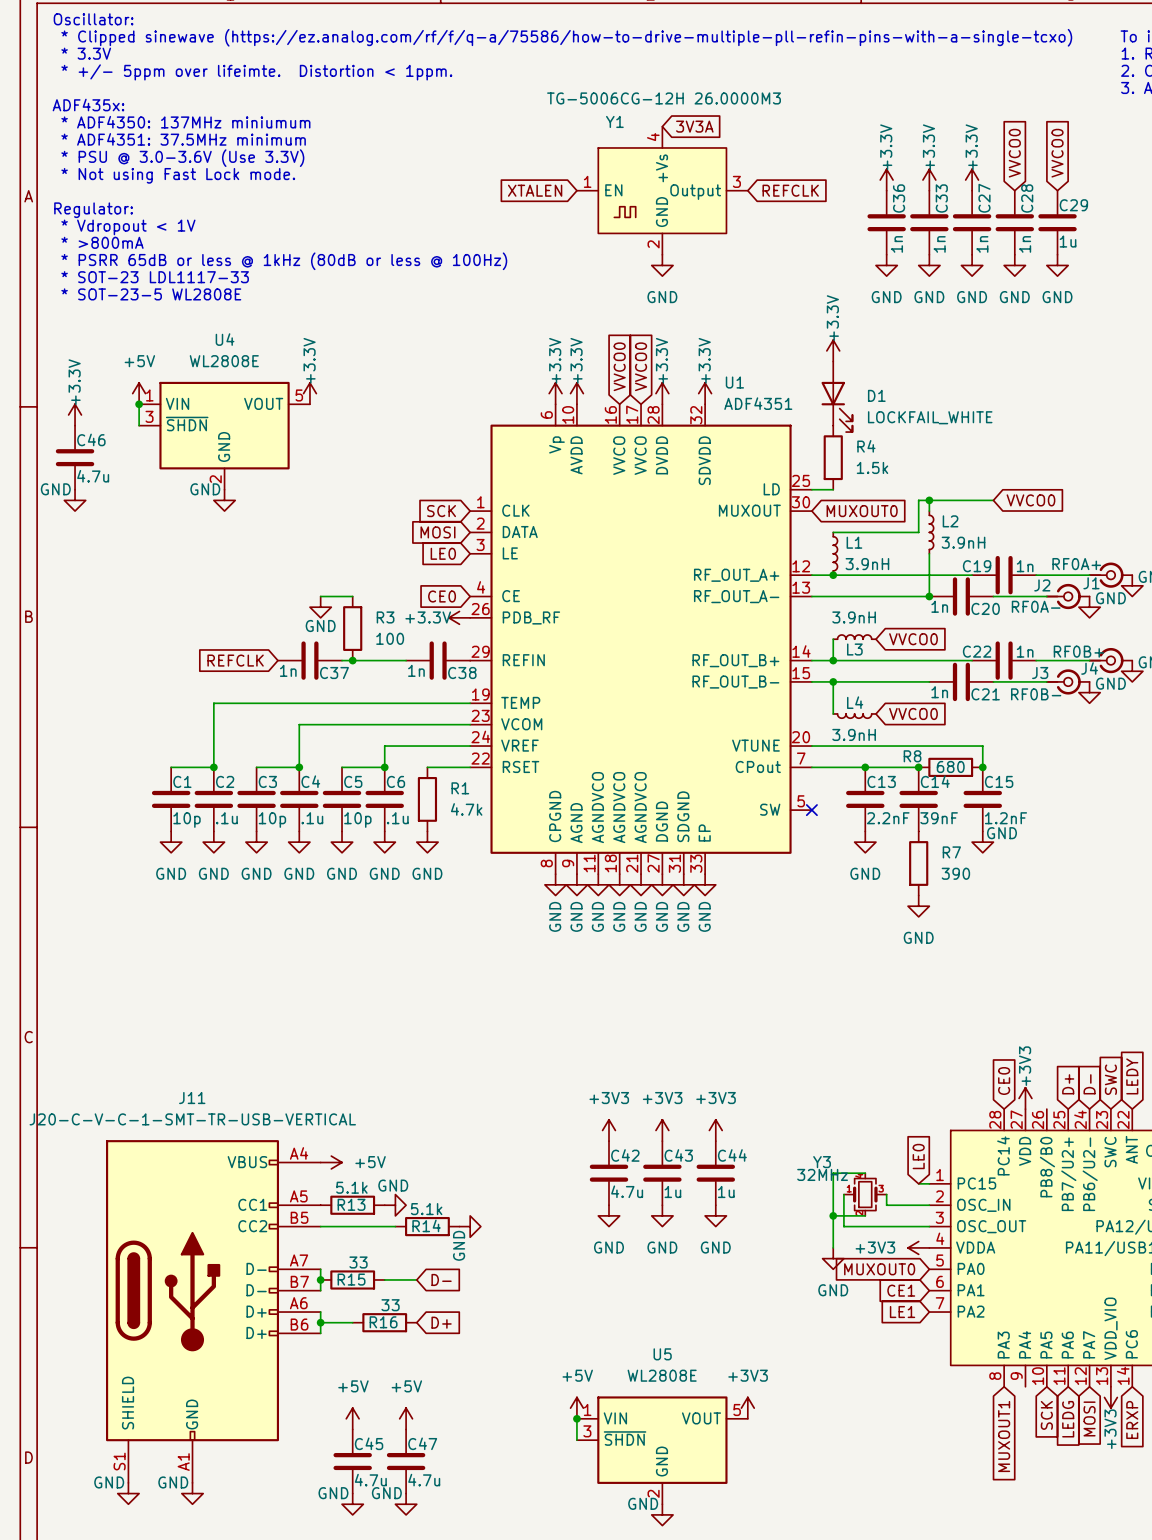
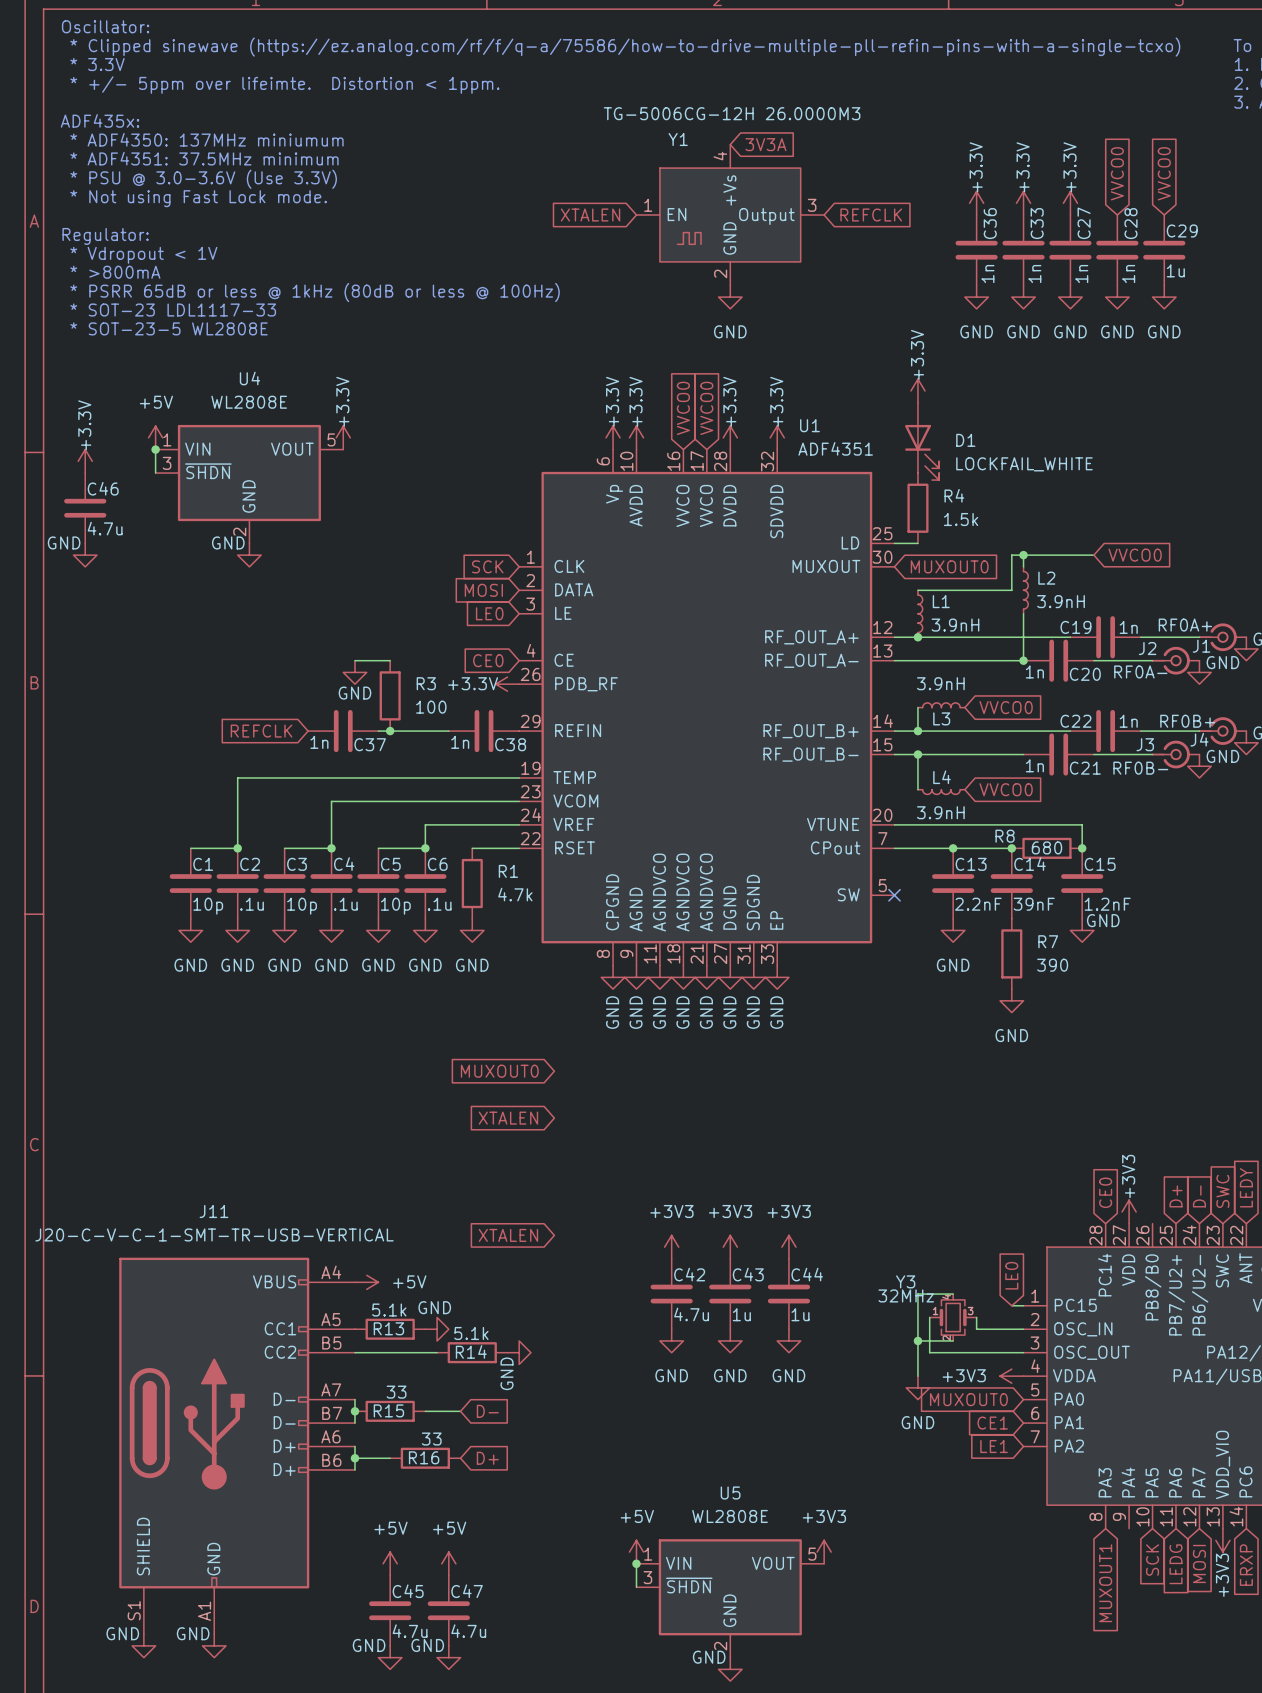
global label: none -> MUXOUT0 (499, 1071)
global label: none -> XTALEN (508, 1118)
global label: none -> XTALEN (508, 1235)

